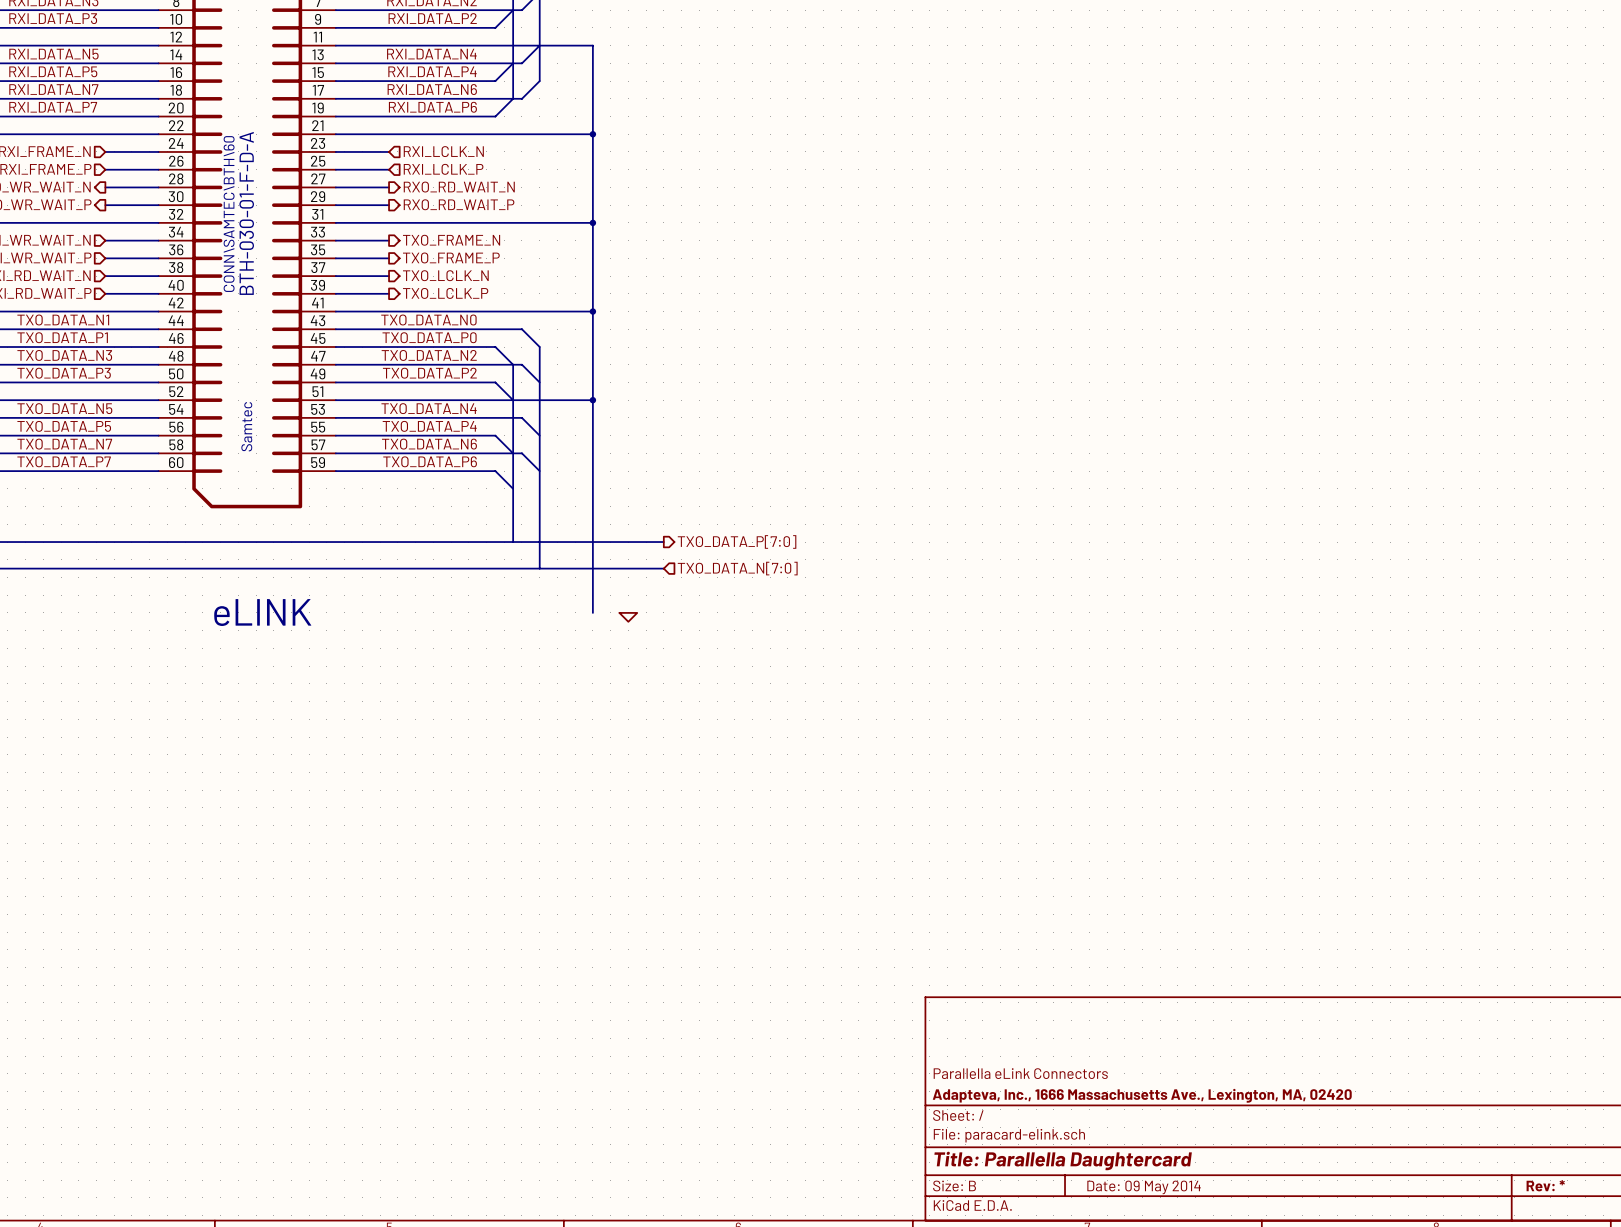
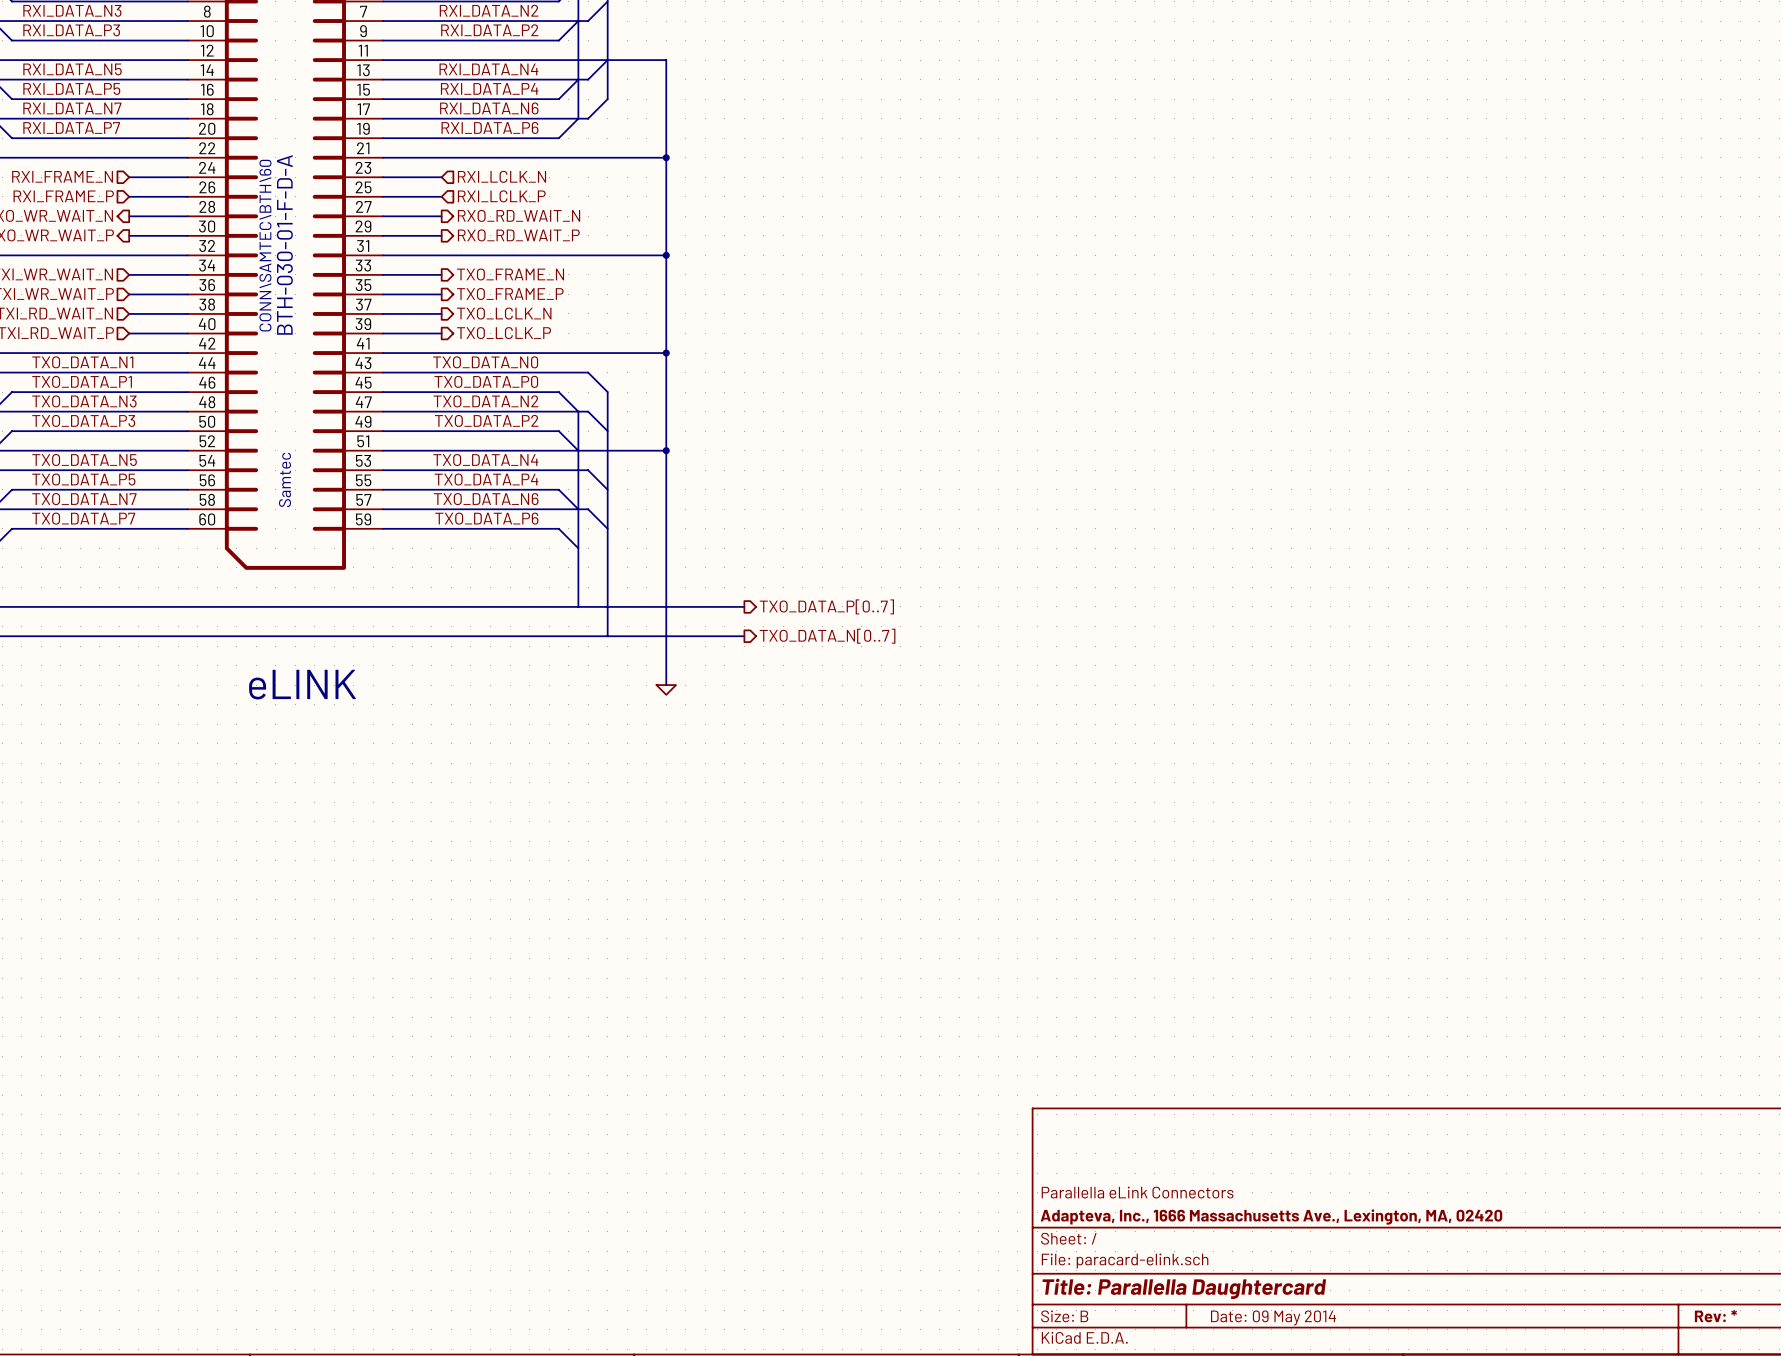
hierarchical label: TXO_DATA_P[7:0] (737, 541) -> TXO_DATA_P[0..7] (826, 606)
hierarchical label shape: input (737, 568) -> output (827, 636)
hierarchical label: TXO_DATA_N[7:0] (737, 568) -> TXO_DATA_N[0..7] (827, 636)
power symbol position: (628, 617) -> (666, 689)

